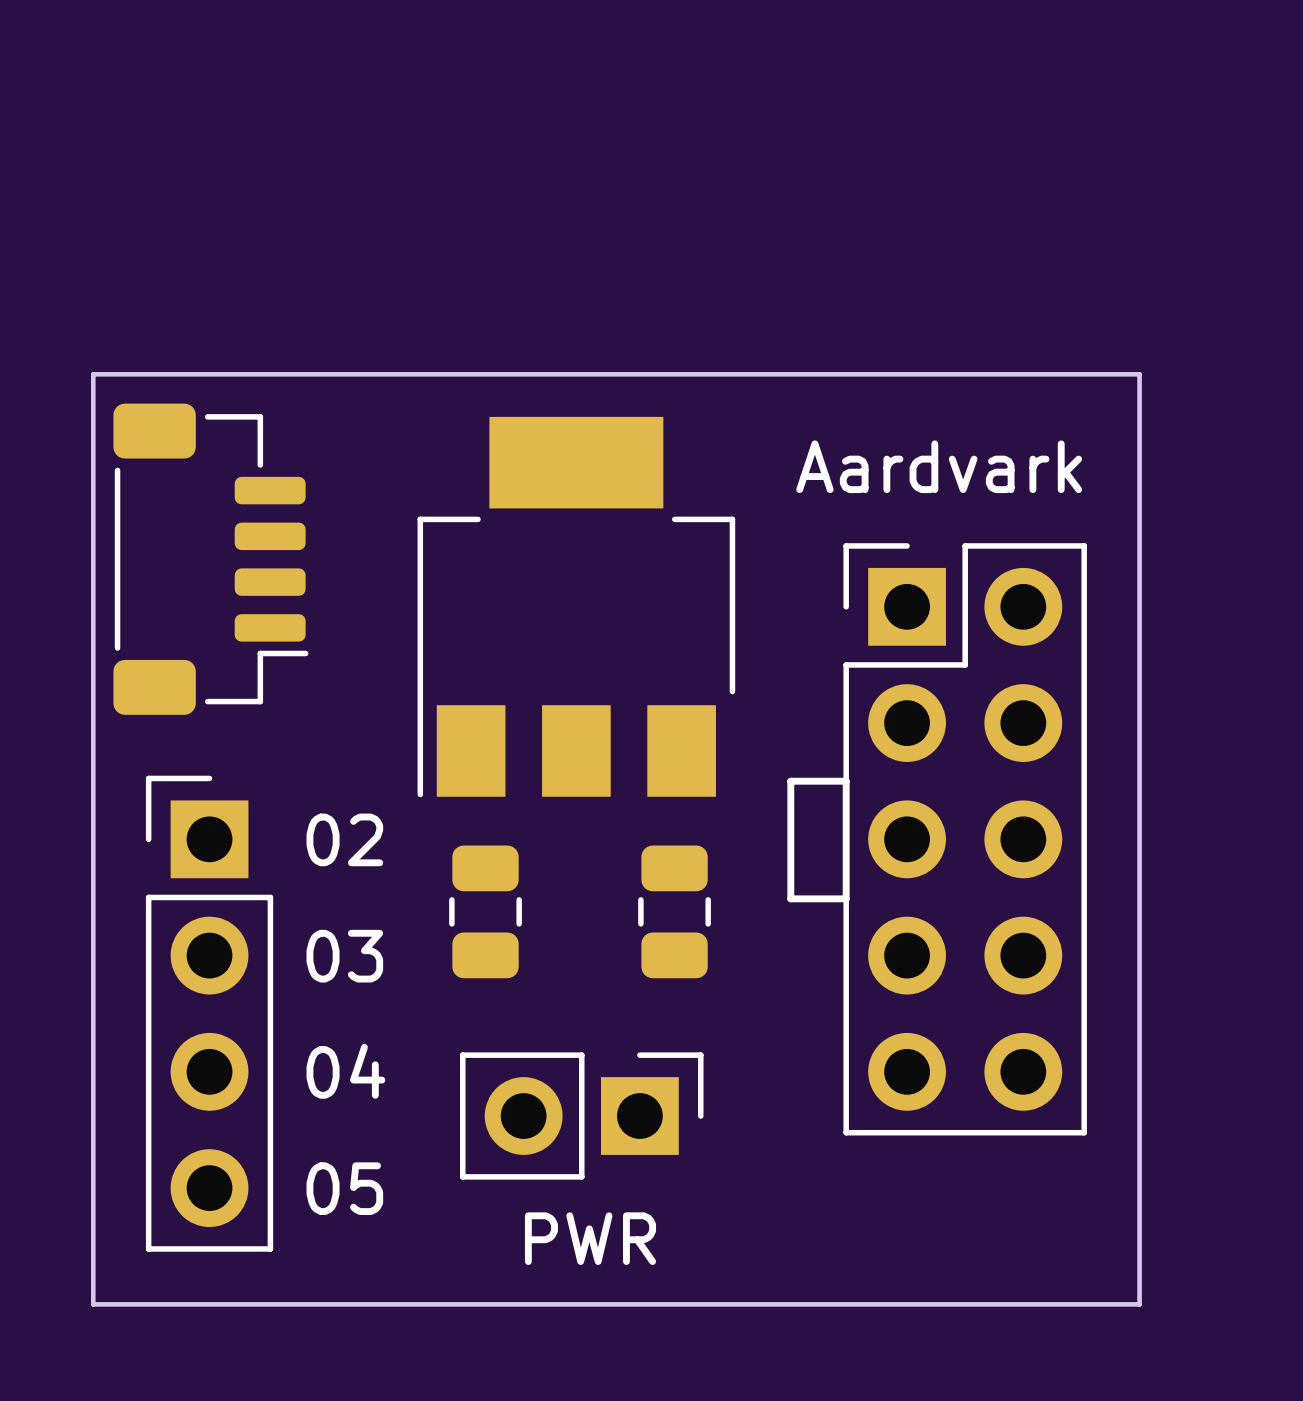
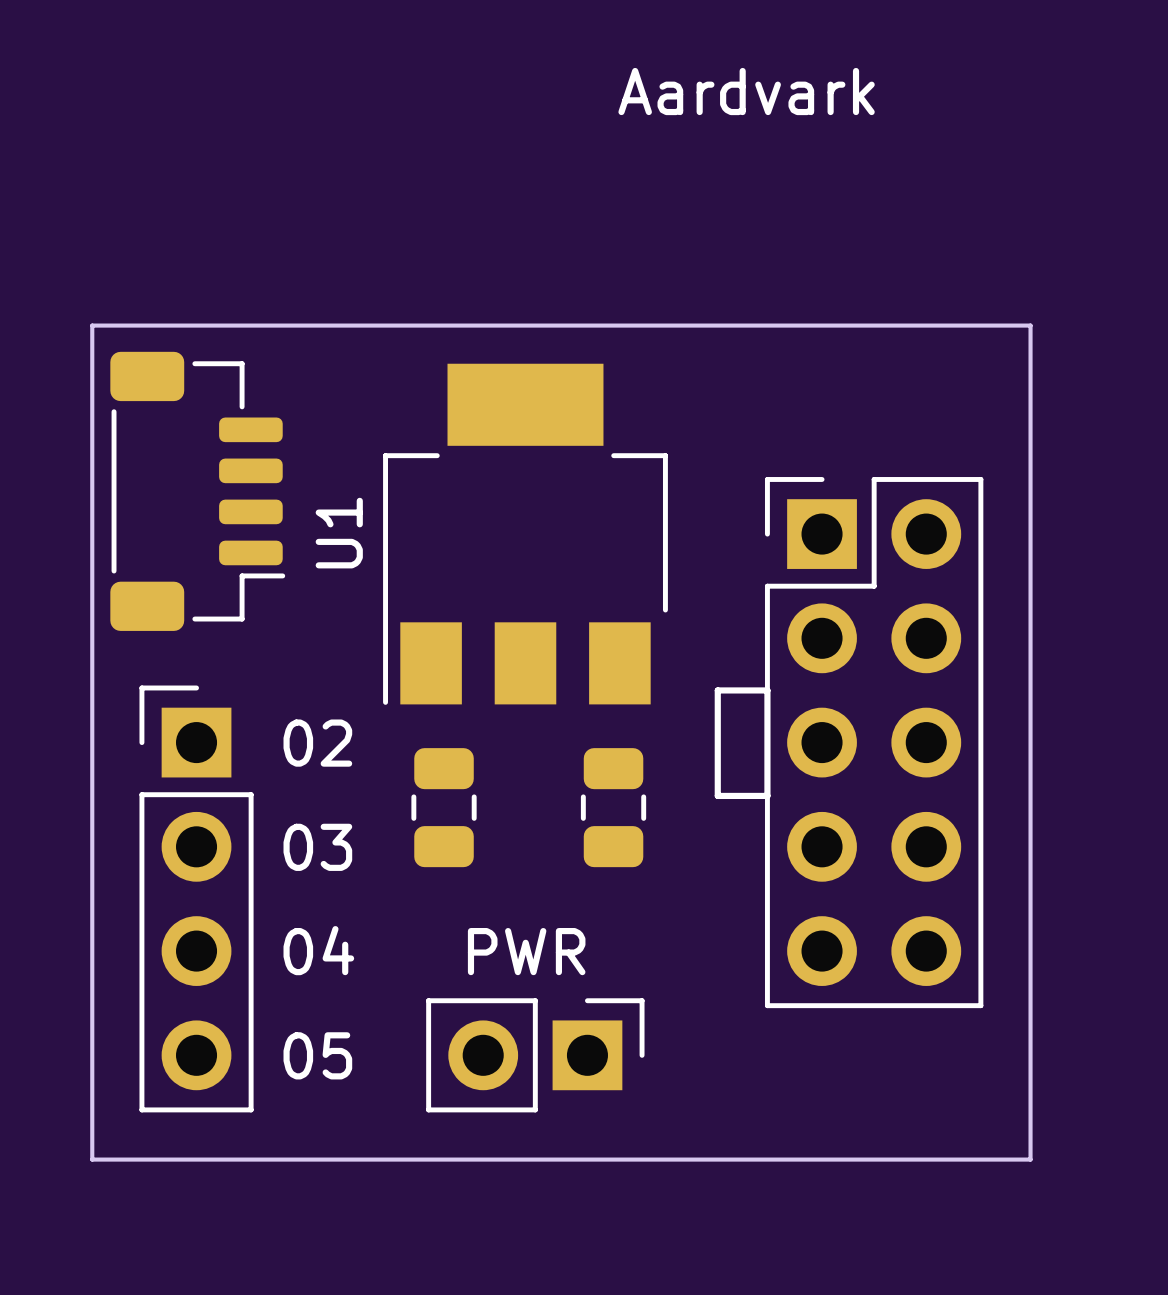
text position: Aardvark (939, 466) -> Aardvark (746, 91)
U1 name: none -> U1 (339, 533)
part position: (581, 1116) -> (535, 1055)
text position: PWR (590, 1238) -> PWR (526, 951)

